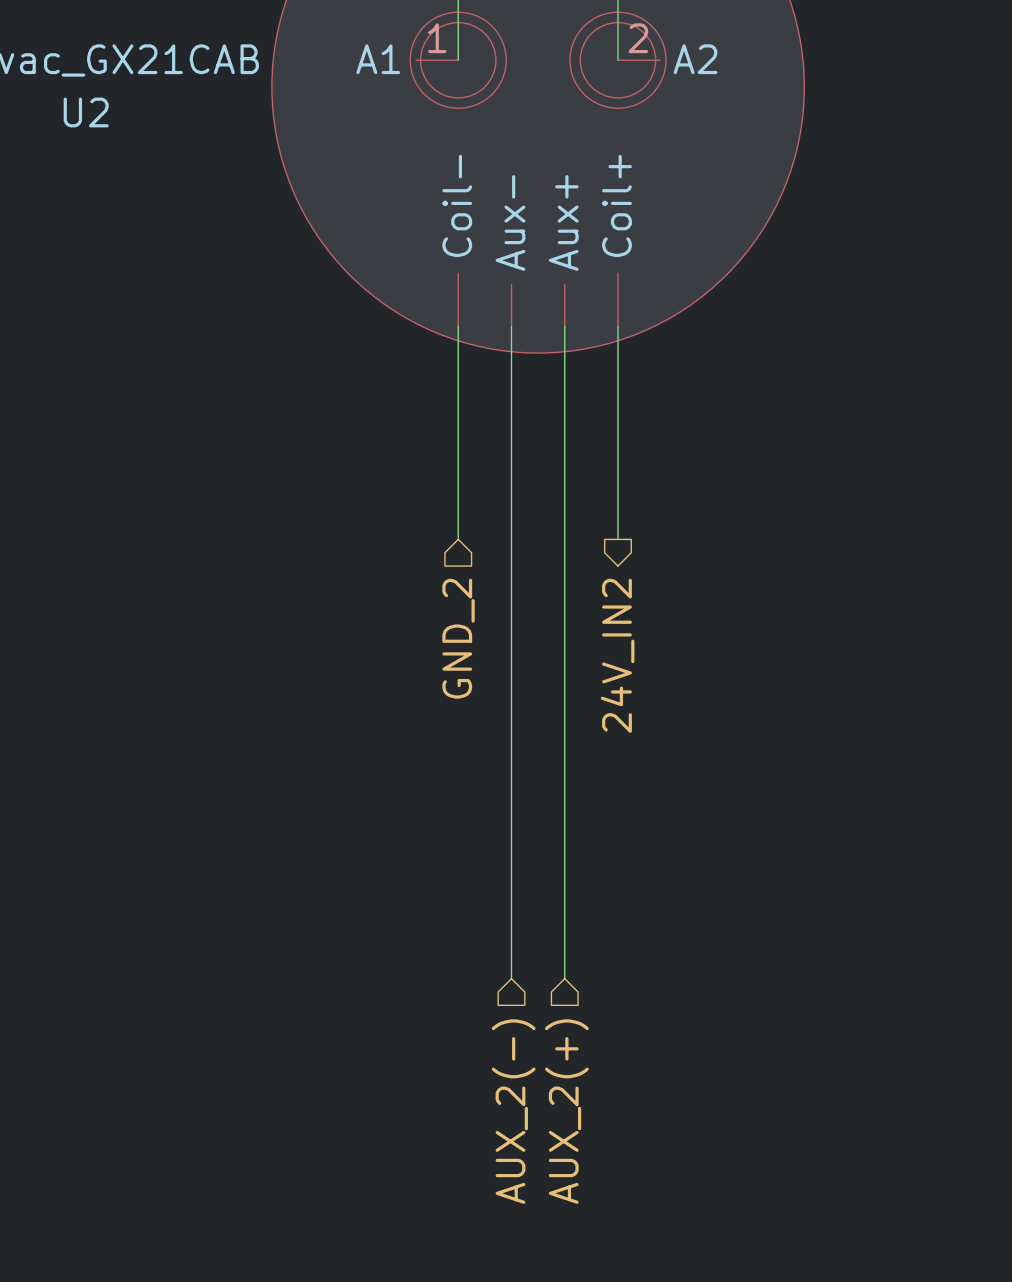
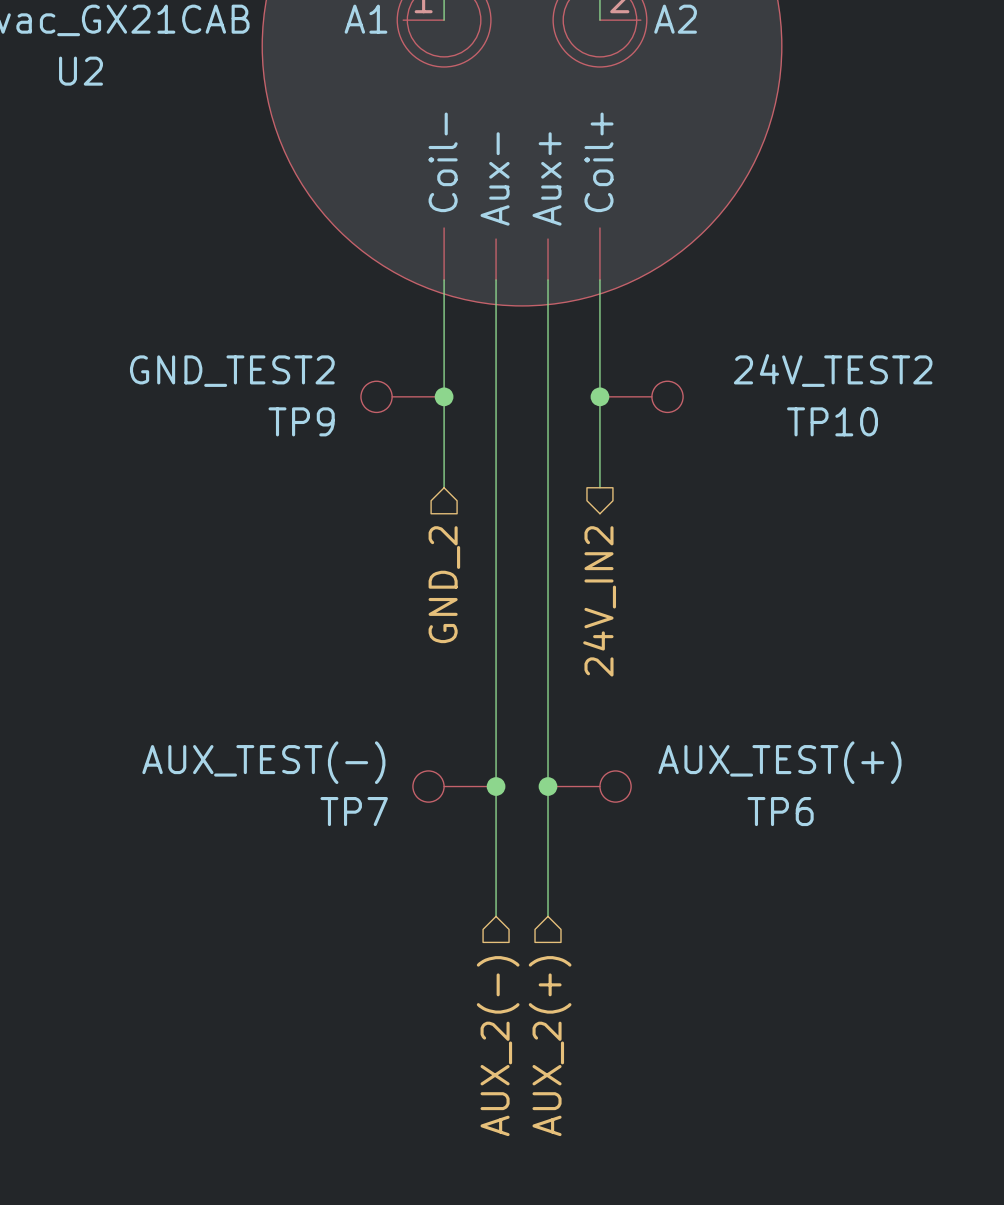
TP9: none -> GND_TEST2 (402, 396)
junction: none -> (444, 396)
junction: none -> (599, 396)
TP10: none -> 24V_TEST2 (641, 396)
TP7: none -> AUX_TEST(-) (454, 786)
junction: none -> (496, 786)
junction: none -> (548, 786)
TP6: none -> AUX_TEST(+) (589, 786)

